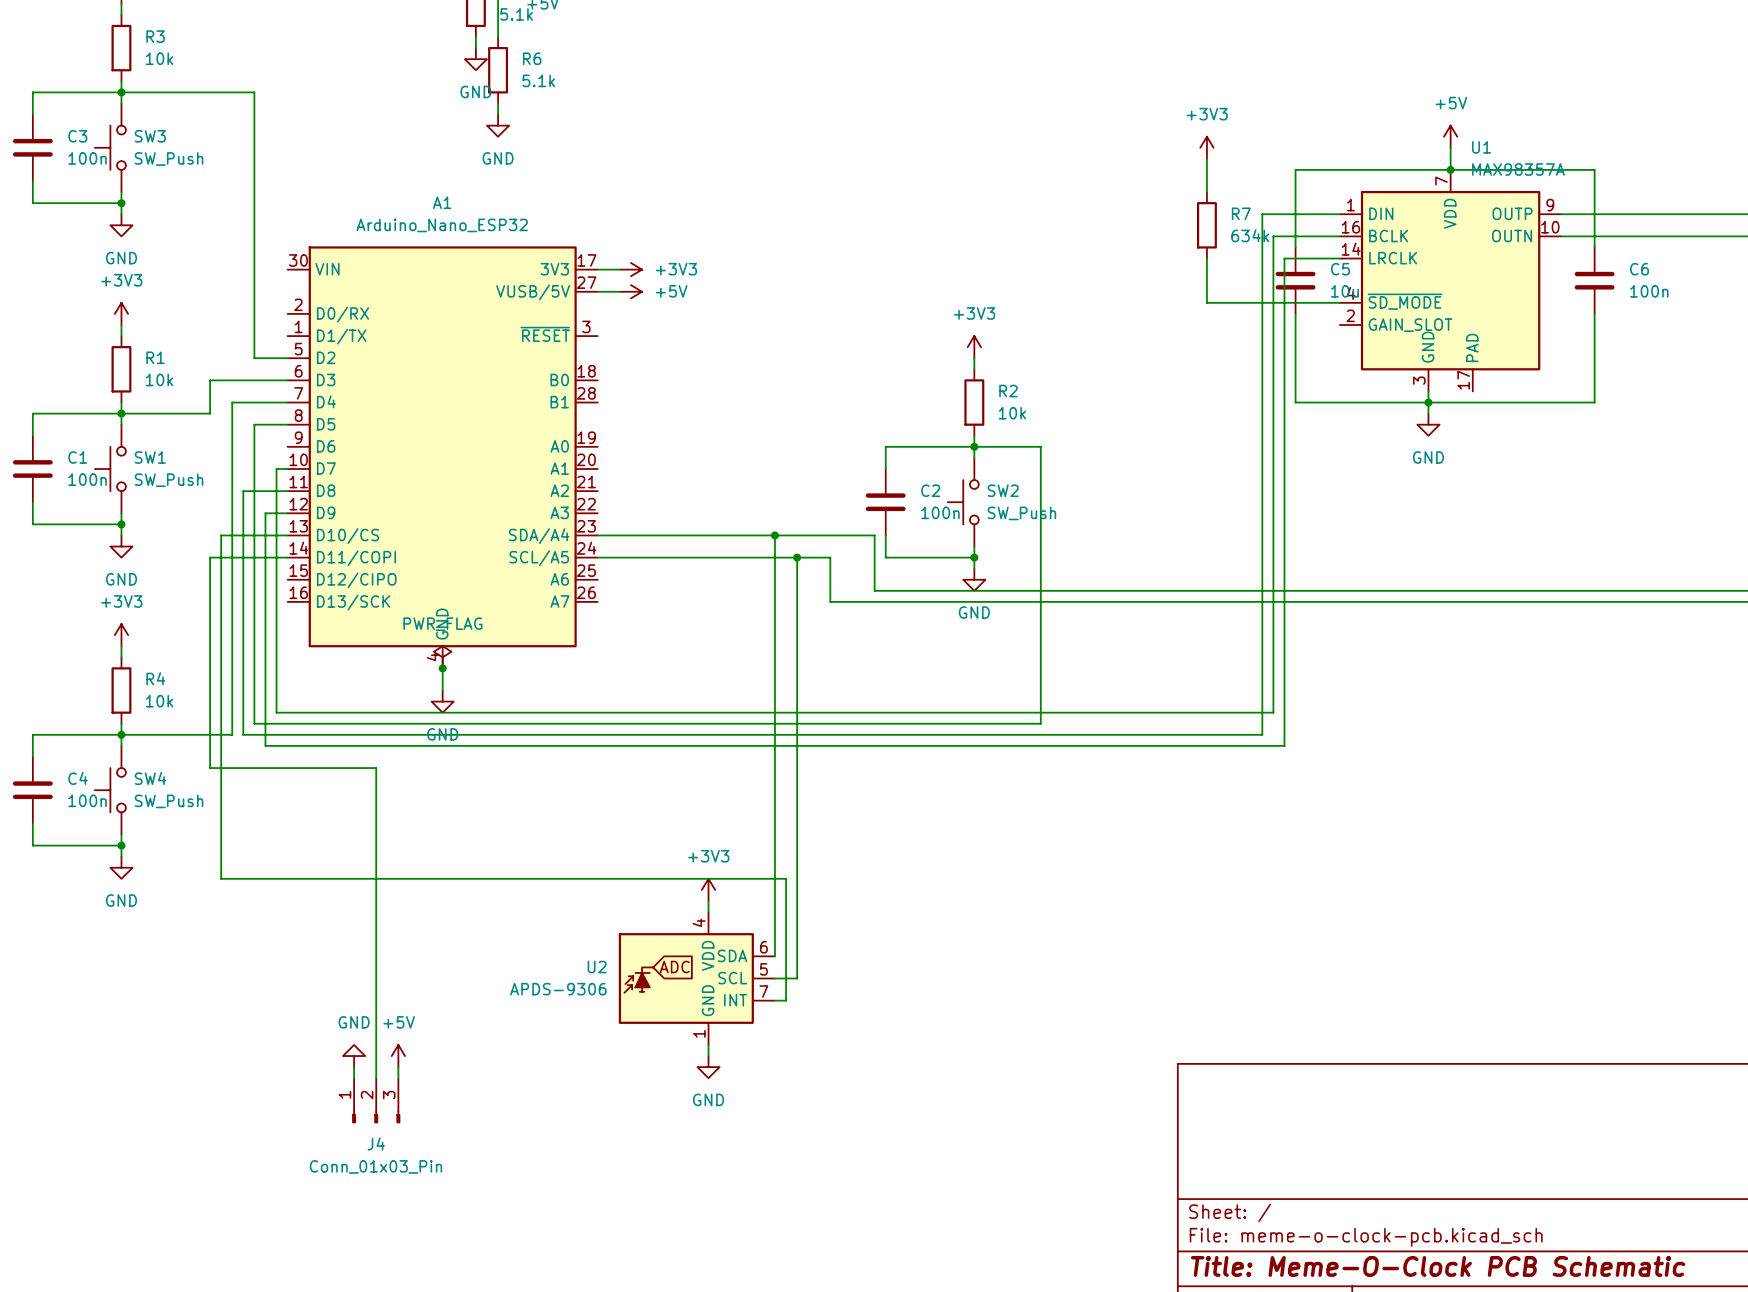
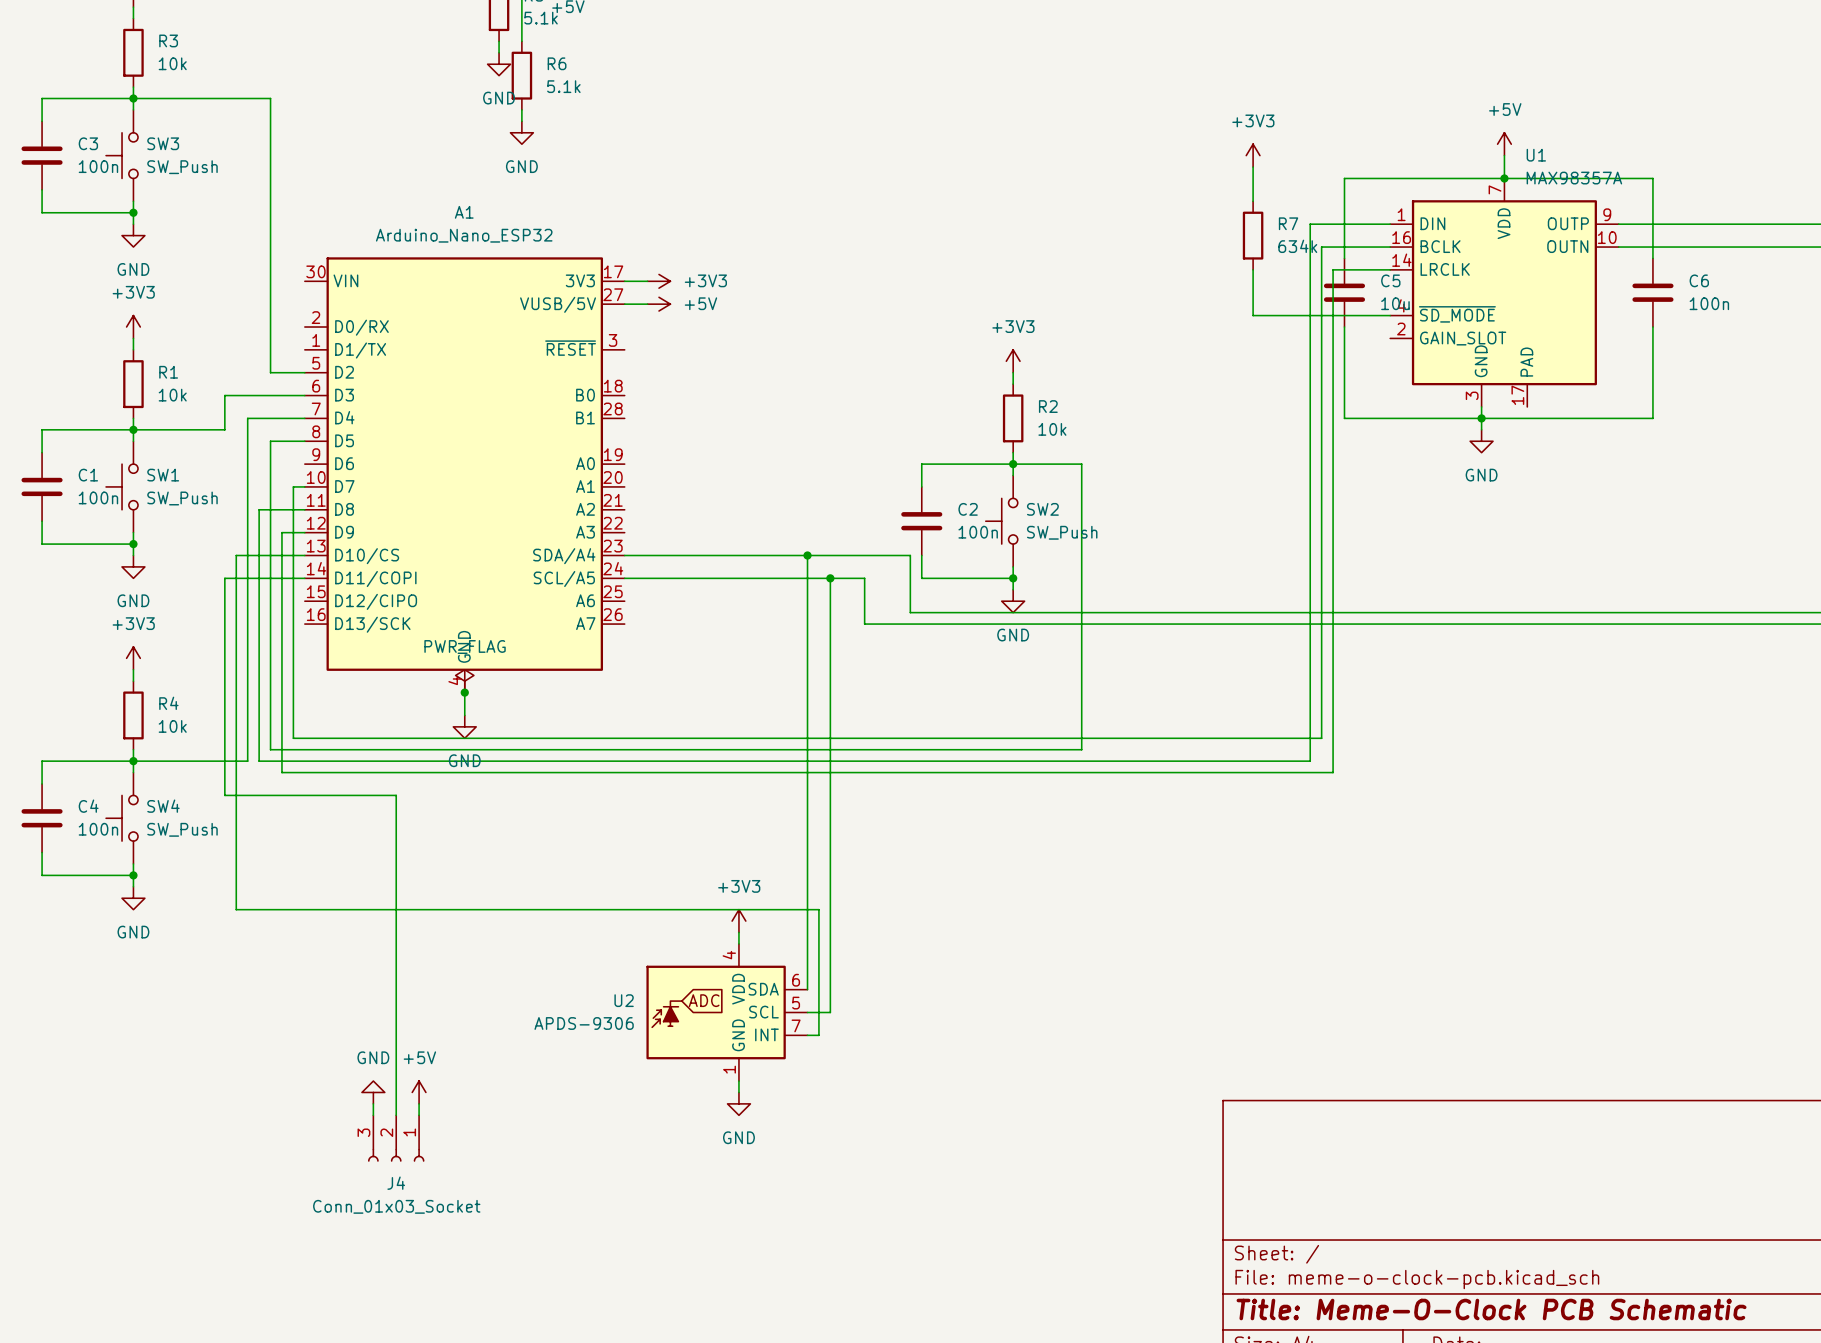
J4 symbol: [352, 1078, 401, 1124] -> [368, 1115, 425, 1162]
J4 value: Conn_01x03_Pin (375, 1166) -> Conn_01x03_Socket (396, 1206)

